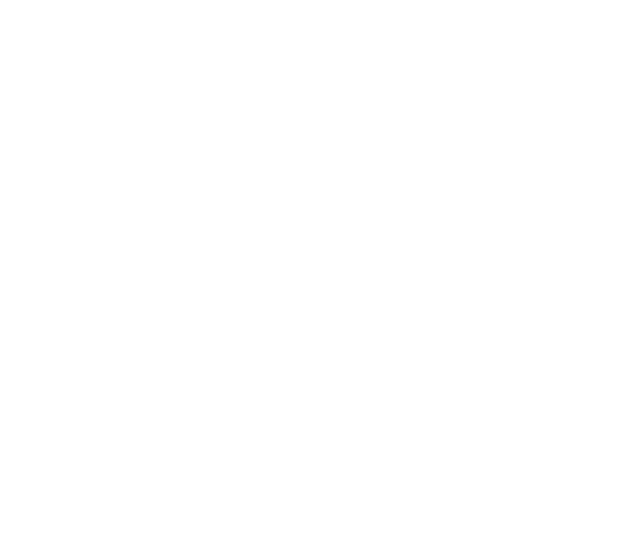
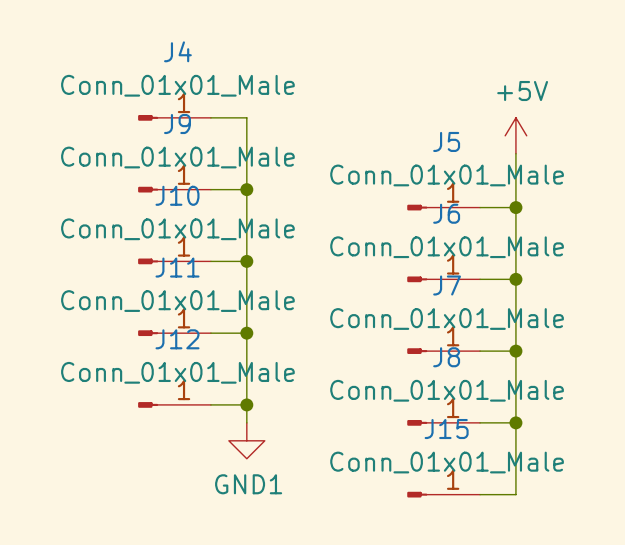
J4: none -> Conn_01x01_Male (174, 117)
wire: none -> (210, 117) (246, 117) (246, 422)
power symbol: none -> +5V (515, 135)
wire: none -> (515, 153) (515, 494) (480, 494)
J9: none -> Conn_01x01_Male (174, 189)
wire: none -> (210, 189) (246, 189)
junction: none -> (246, 189)
J5: none -> Conn_01x01_Male (443, 207)
wire: none -> (480, 207) (515, 207)
junction: none -> (515, 207)
J10: none -> Conn_01x01_Male (174, 261)
wire: none -> (210, 261) (246, 261)
junction: none -> (246, 261)
J6: none -> Conn_01x01_Male (443, 279)
wire: none -> (480, 279) (515, 279)
junction: none -> (515, 279)
J11: none -> Conn_01x01_Male (174, 333)
wire: none -> (210, 333) (246, 333)
junction: none -> (246, 333)
J7: none -> Conn_01x01_Male (443, 351)
wire: none -> (480, 351) (515, 351)
junction: none -> (515, 351)
J12: none -> Conn_01x01_Male (174, 404)
wire: none -> (210, 404) (246, 404)
junction: none -> (246, 404)
J8: none -> Conn_01x01_Male (443, 422)
wire: none -> (480, 422) (515, 422)
junction: none -> (515, 422)
power symbol: none -> GND1 (246, 440)
J15: none -> Conn_01x01_Male (443, 494)

